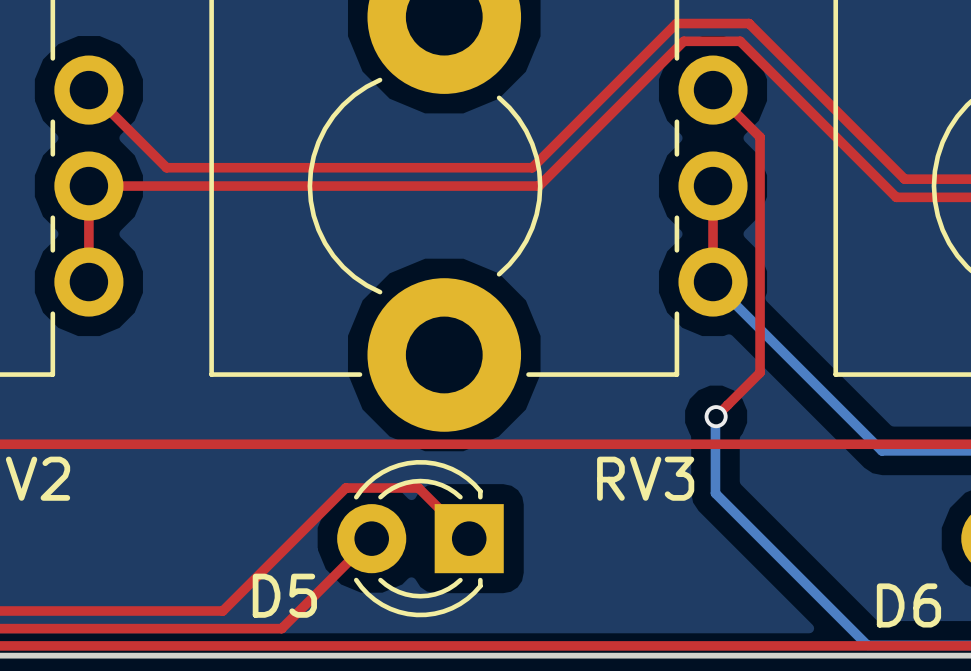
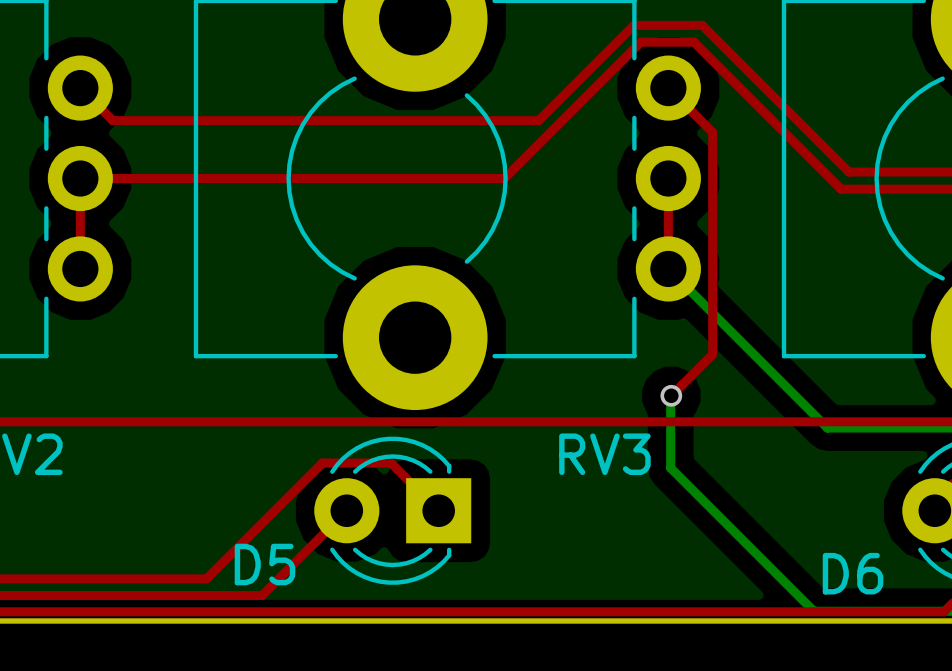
top track: (123, 124) (166, 167) (532, 167) (575, 124) -> (112, 120) (538, 120)

